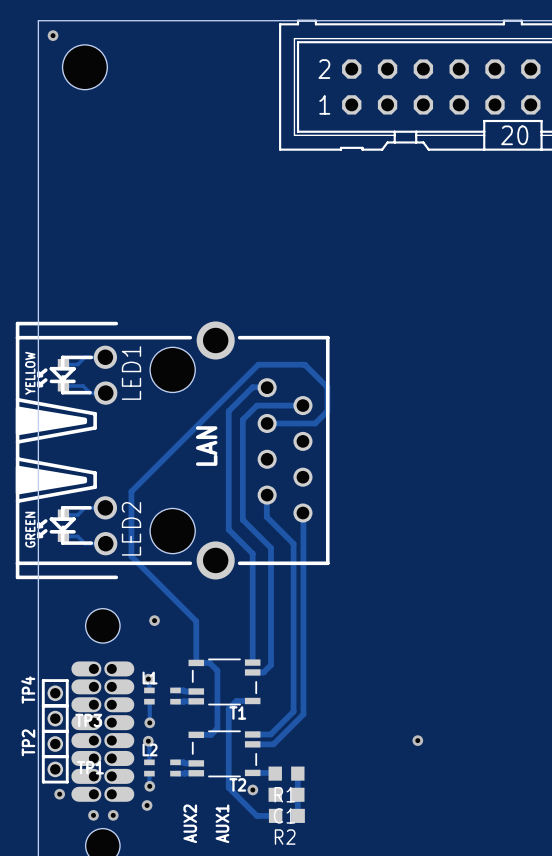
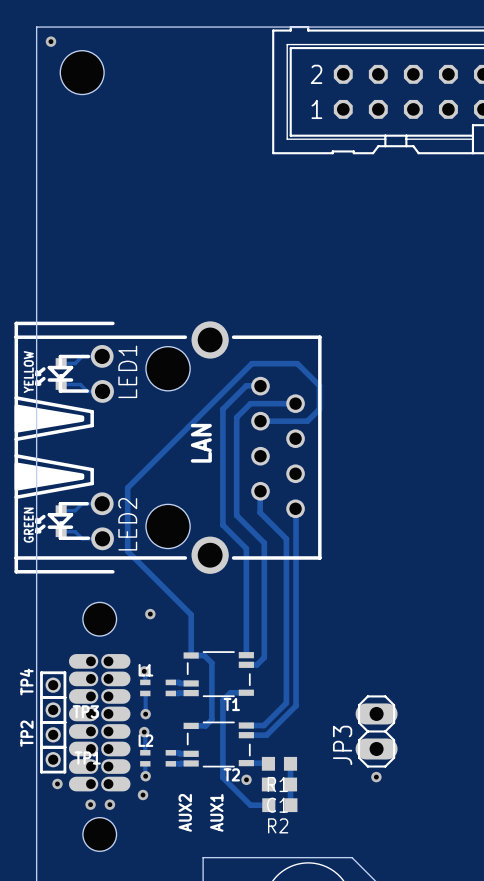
JP3: none -> (376, 731)
via position: (417, 740) -> (376, 777)

